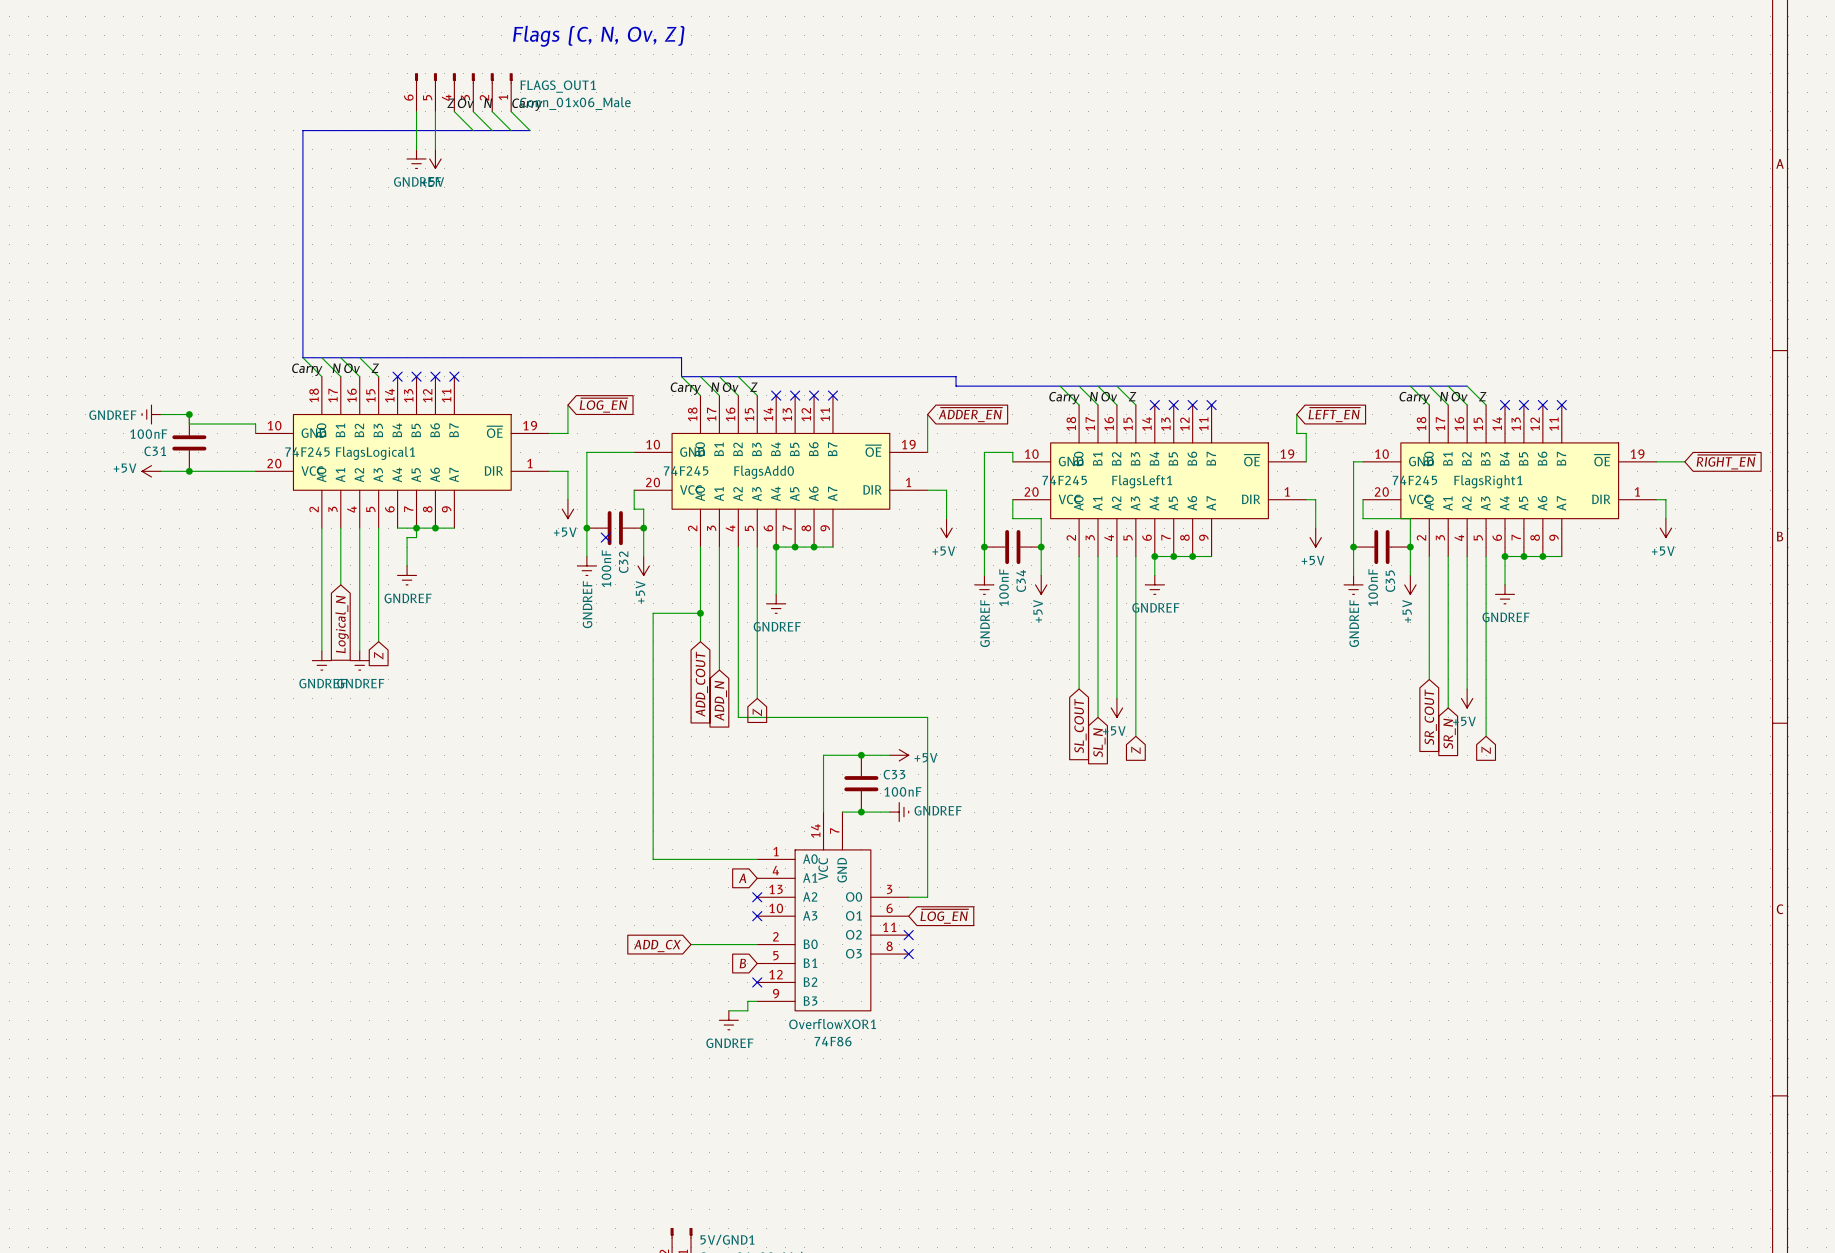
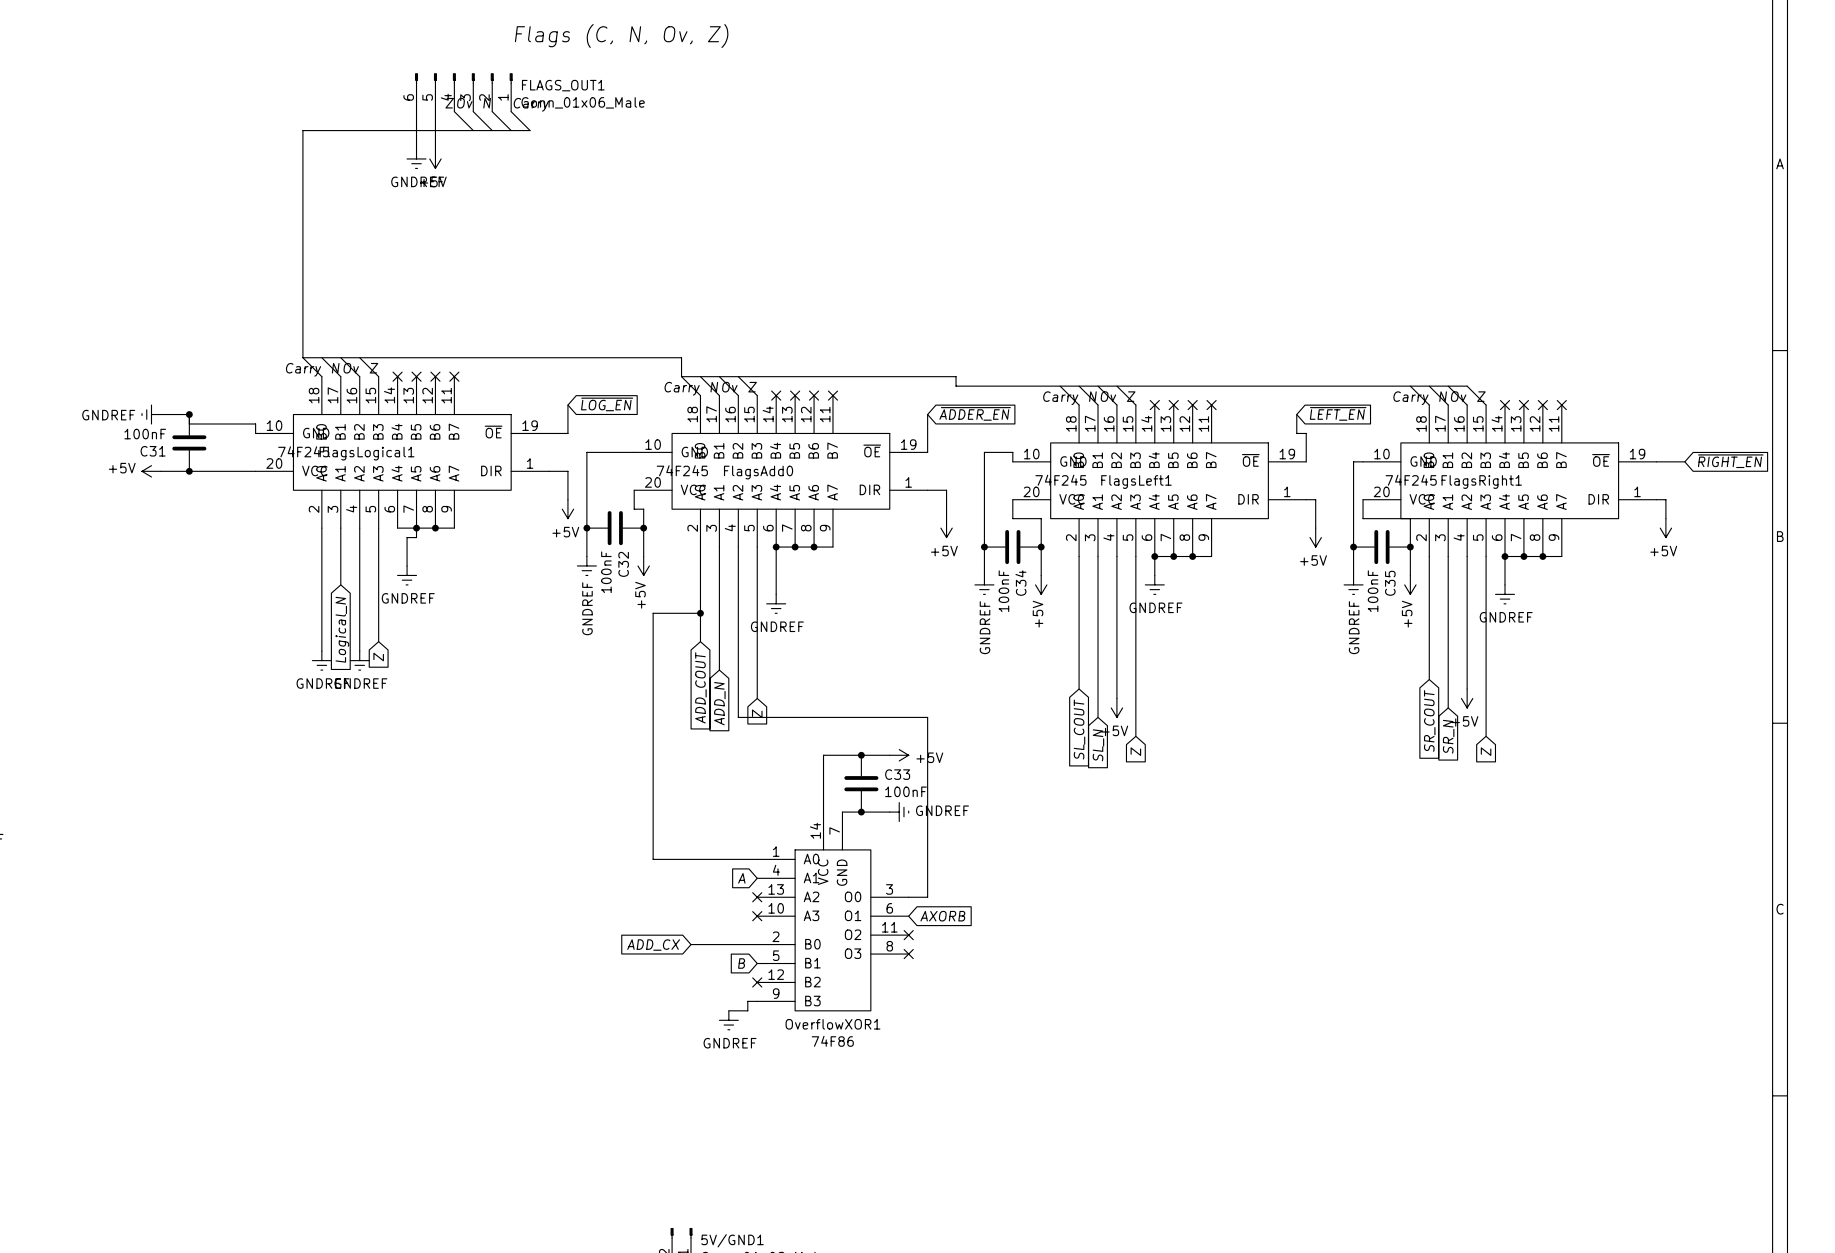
no-connect mark: (605, 537) -> none
global label: ~{LOG_EN} (944, 916) -> AXORB (942, 916)

